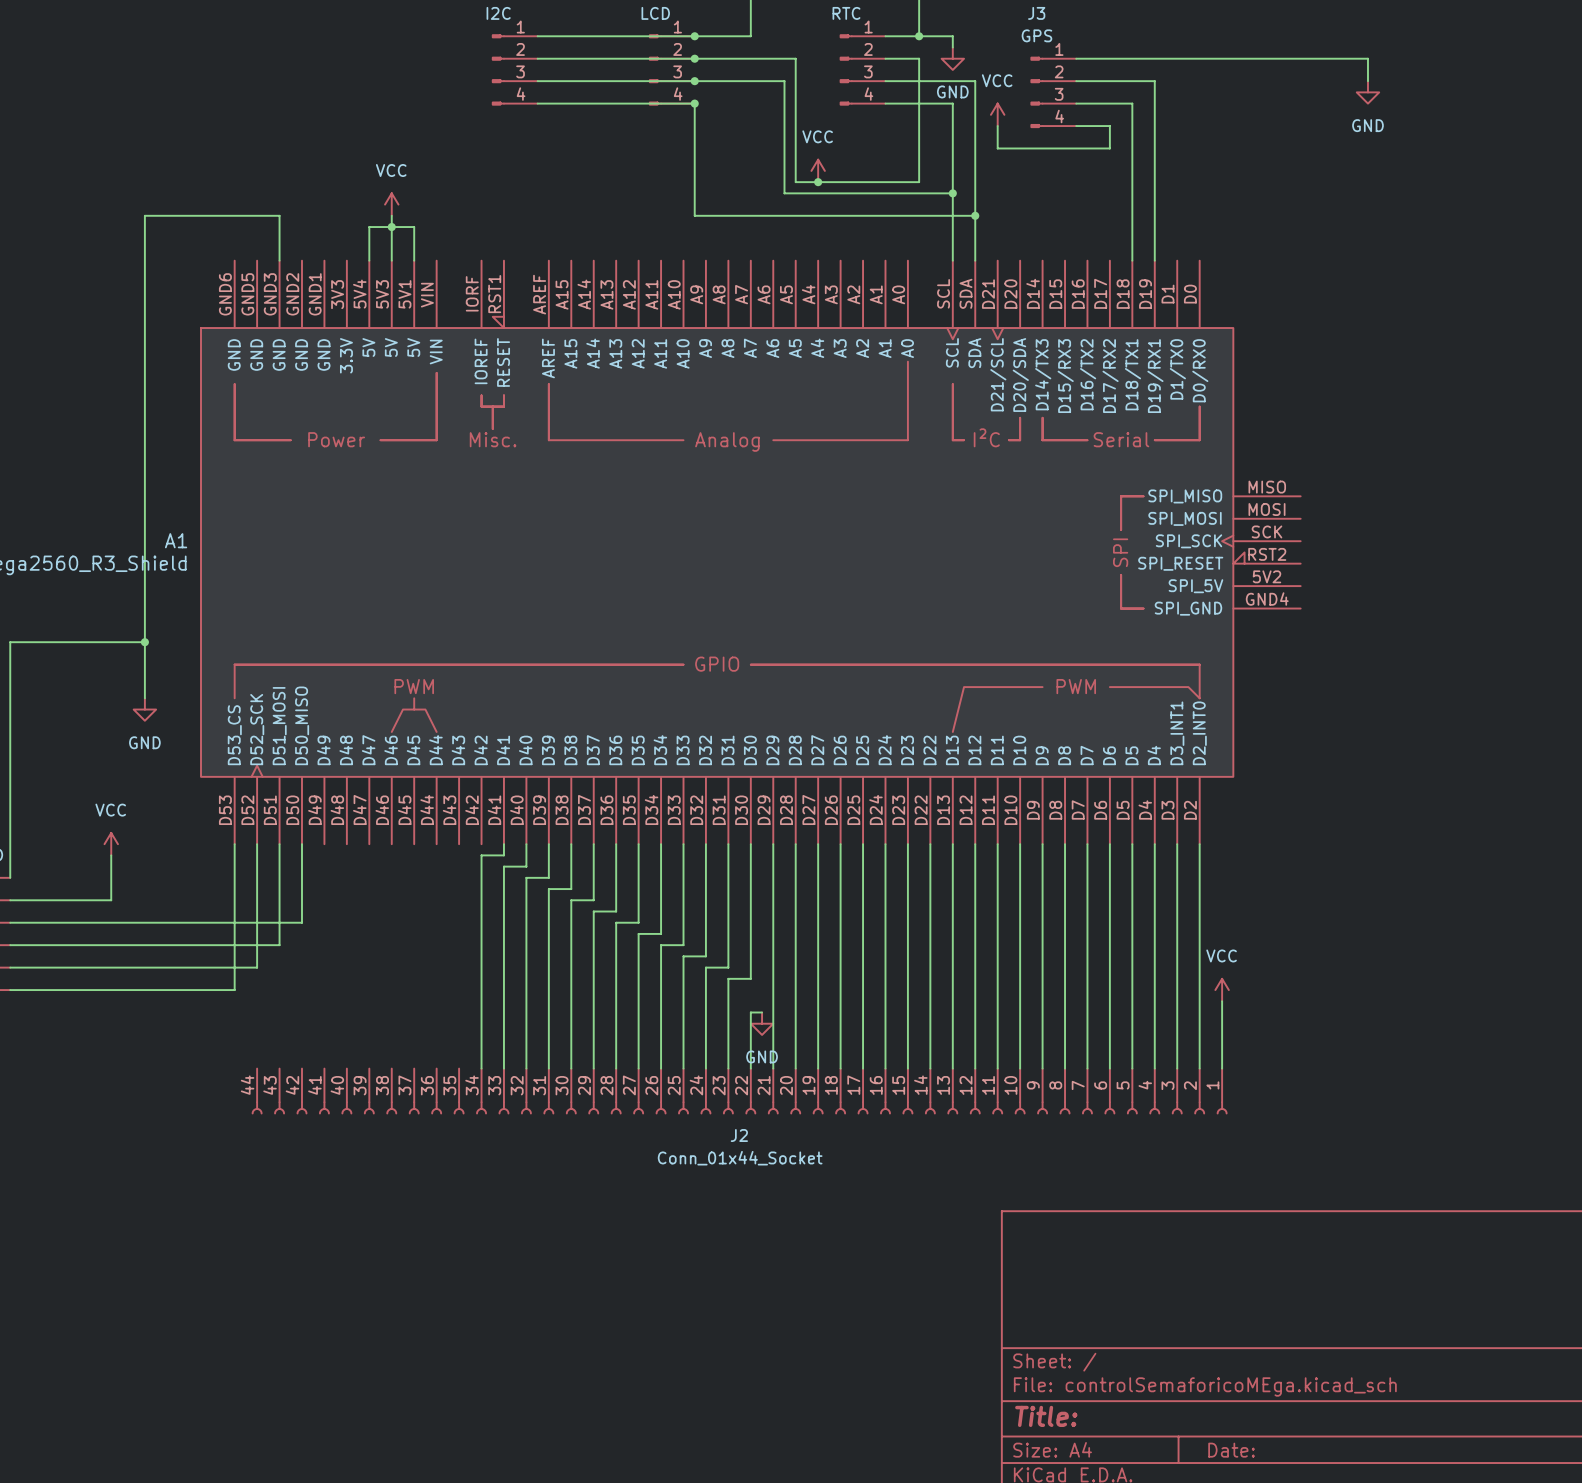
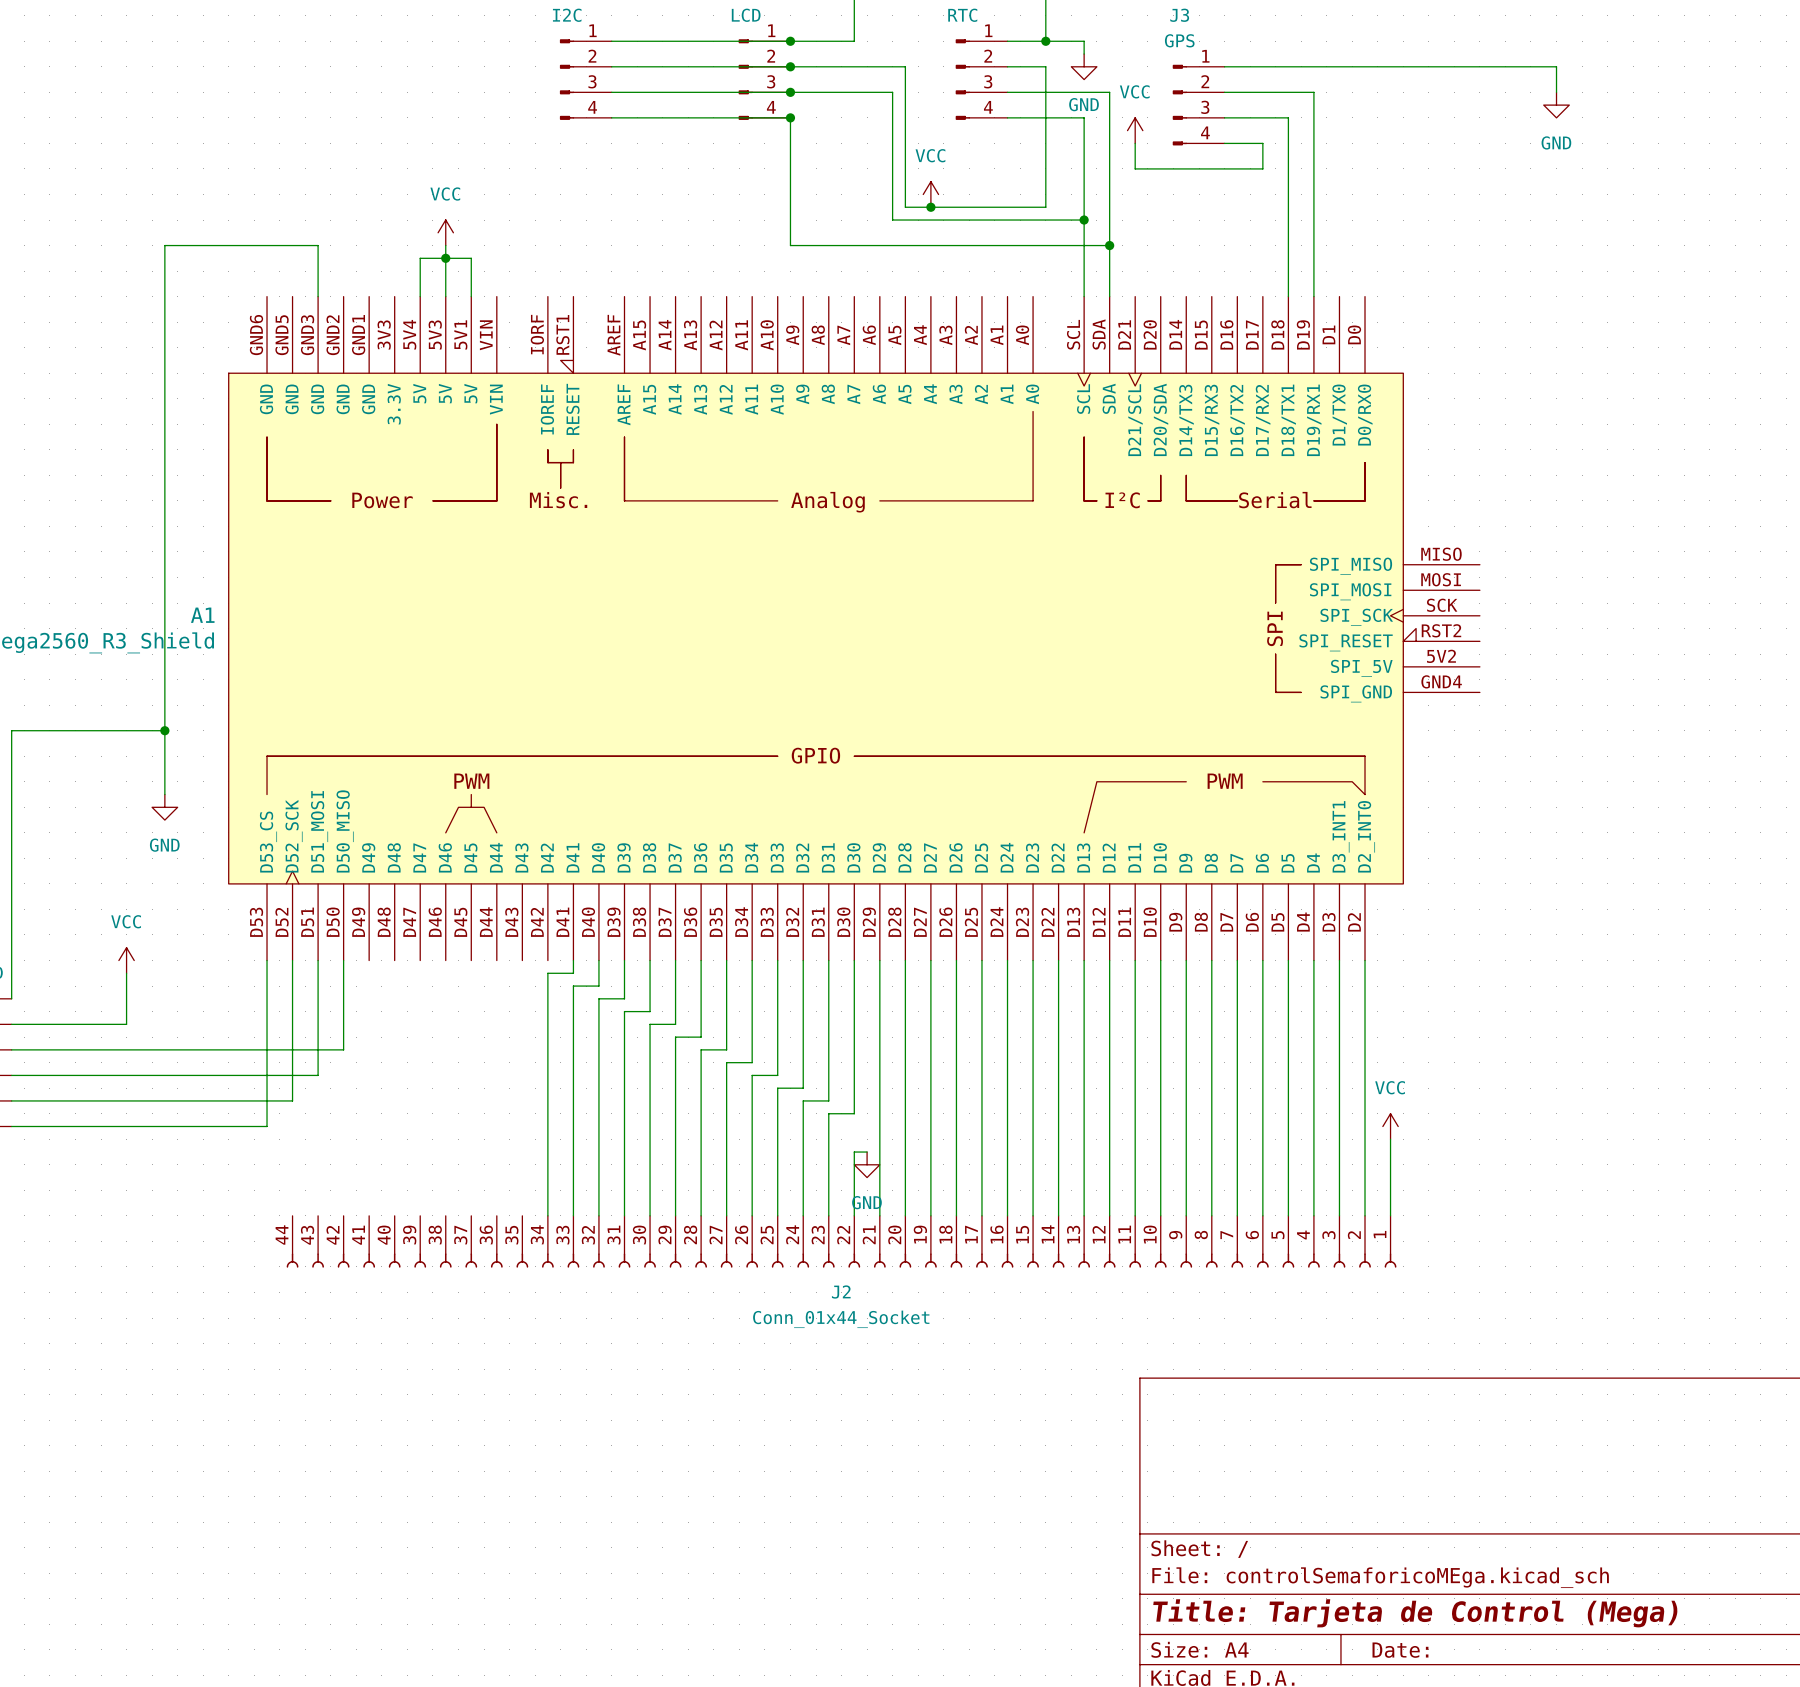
title block: Title: (1046, 1416) -> Title: Tarjeta de Control (Mega) (1415, 1613)

